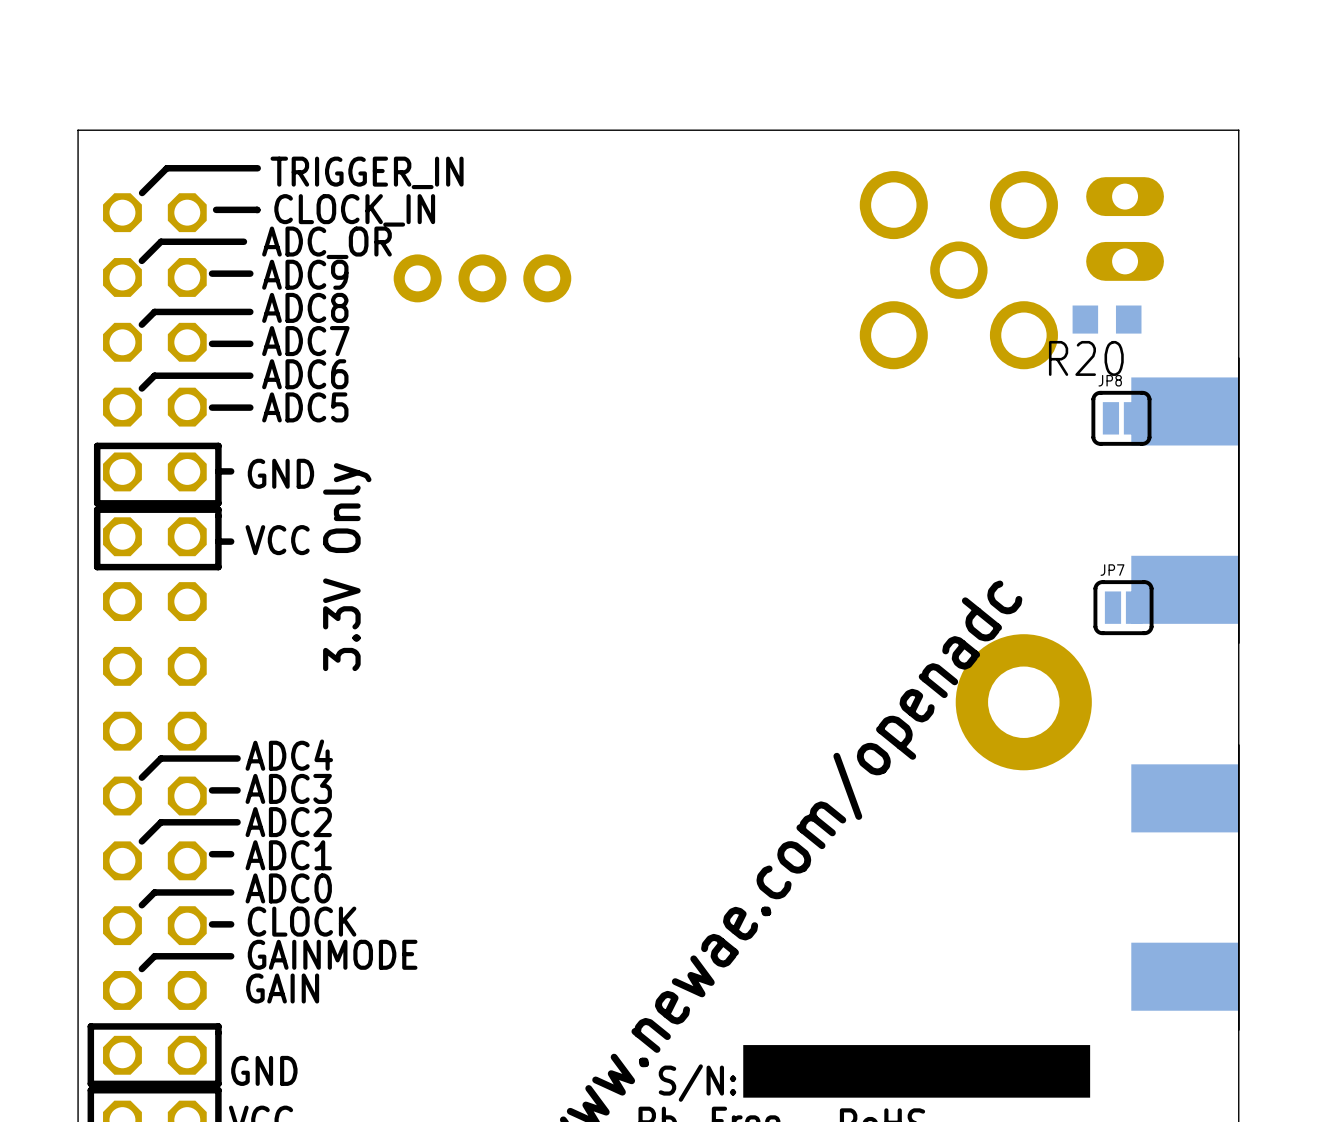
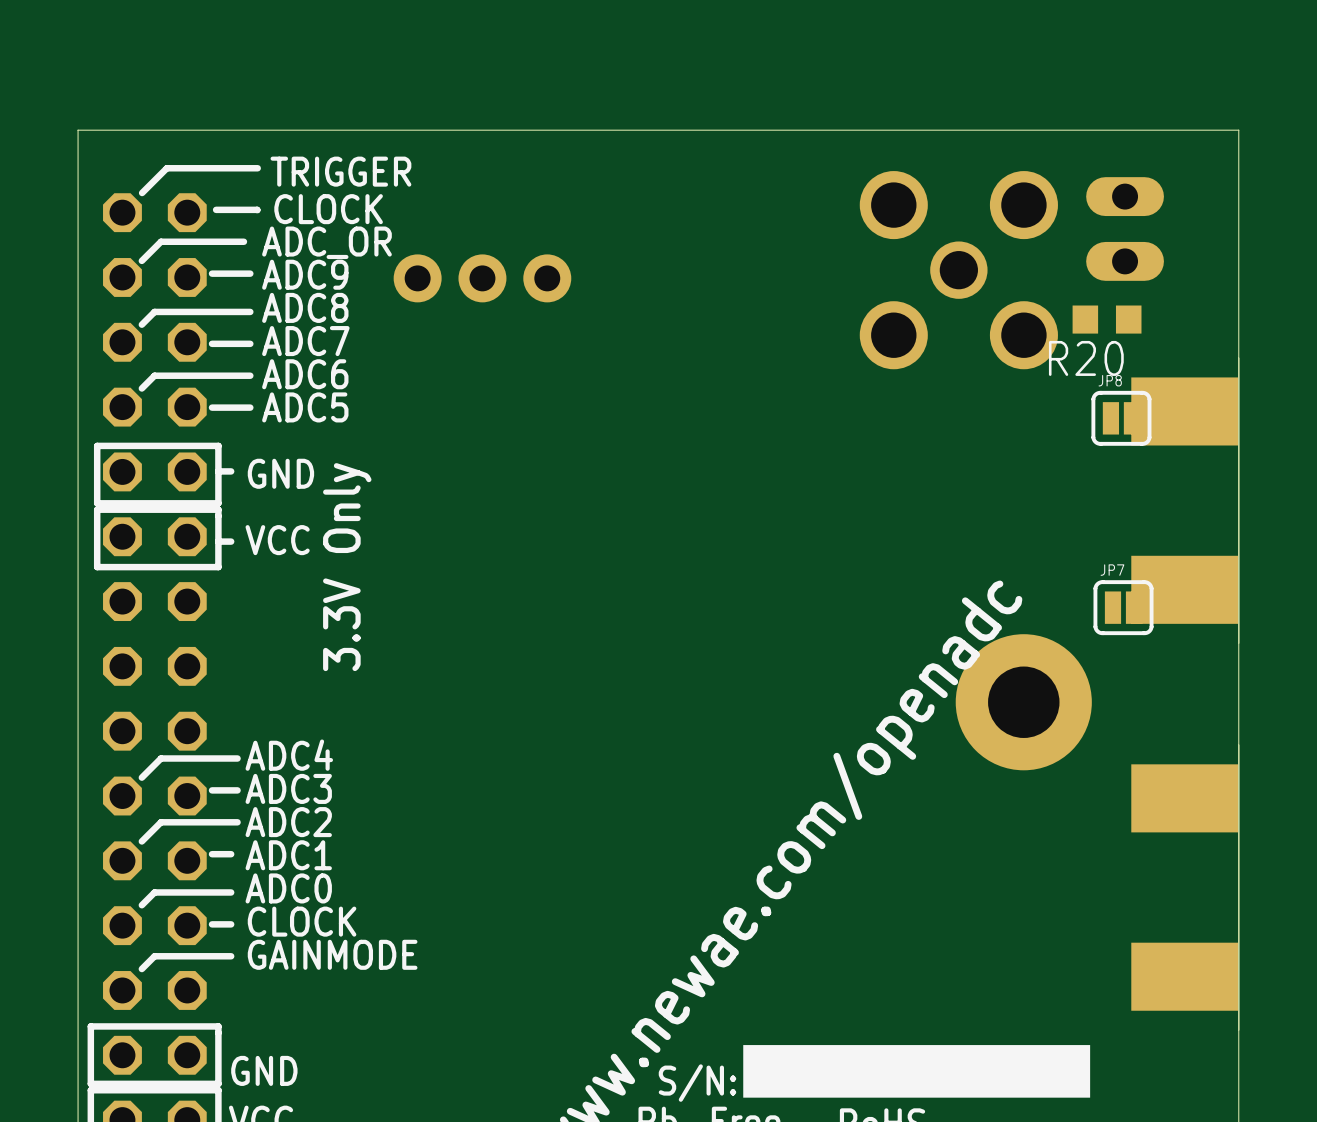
text: TRIGGER_IN (367, 172) -> TRIGGER (340, 171)
text: CLOCK_IN (354, 210) -> CLOCK (328, 209)
text: GAIN (282, 988) -> none

